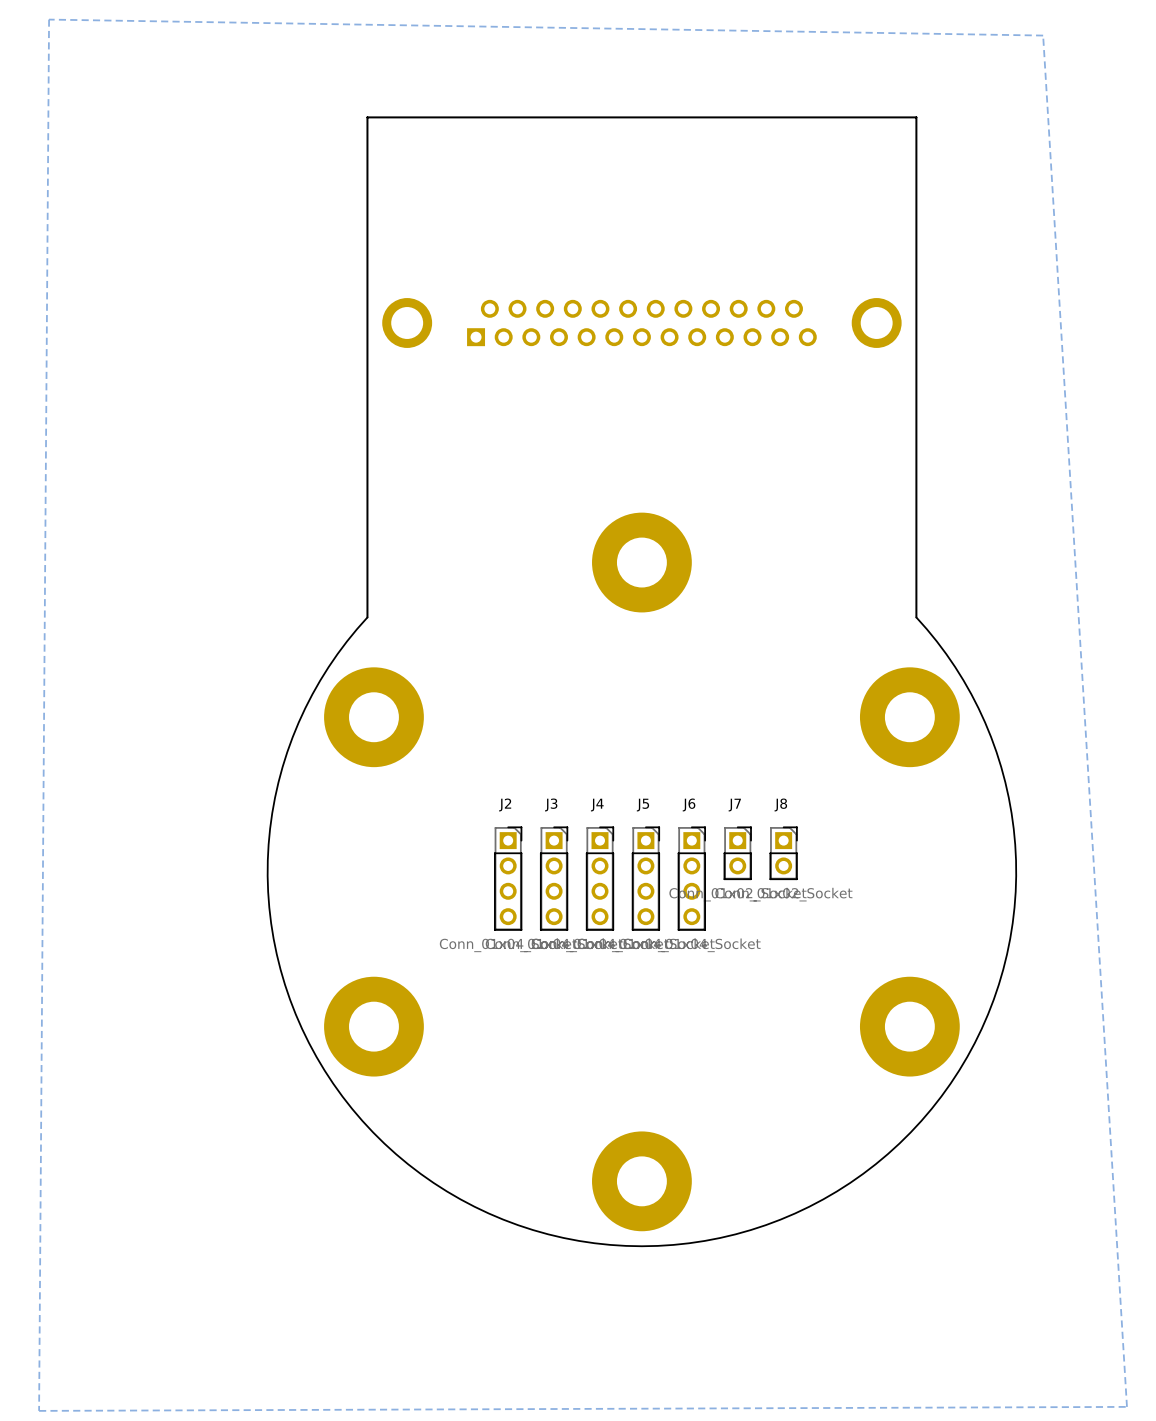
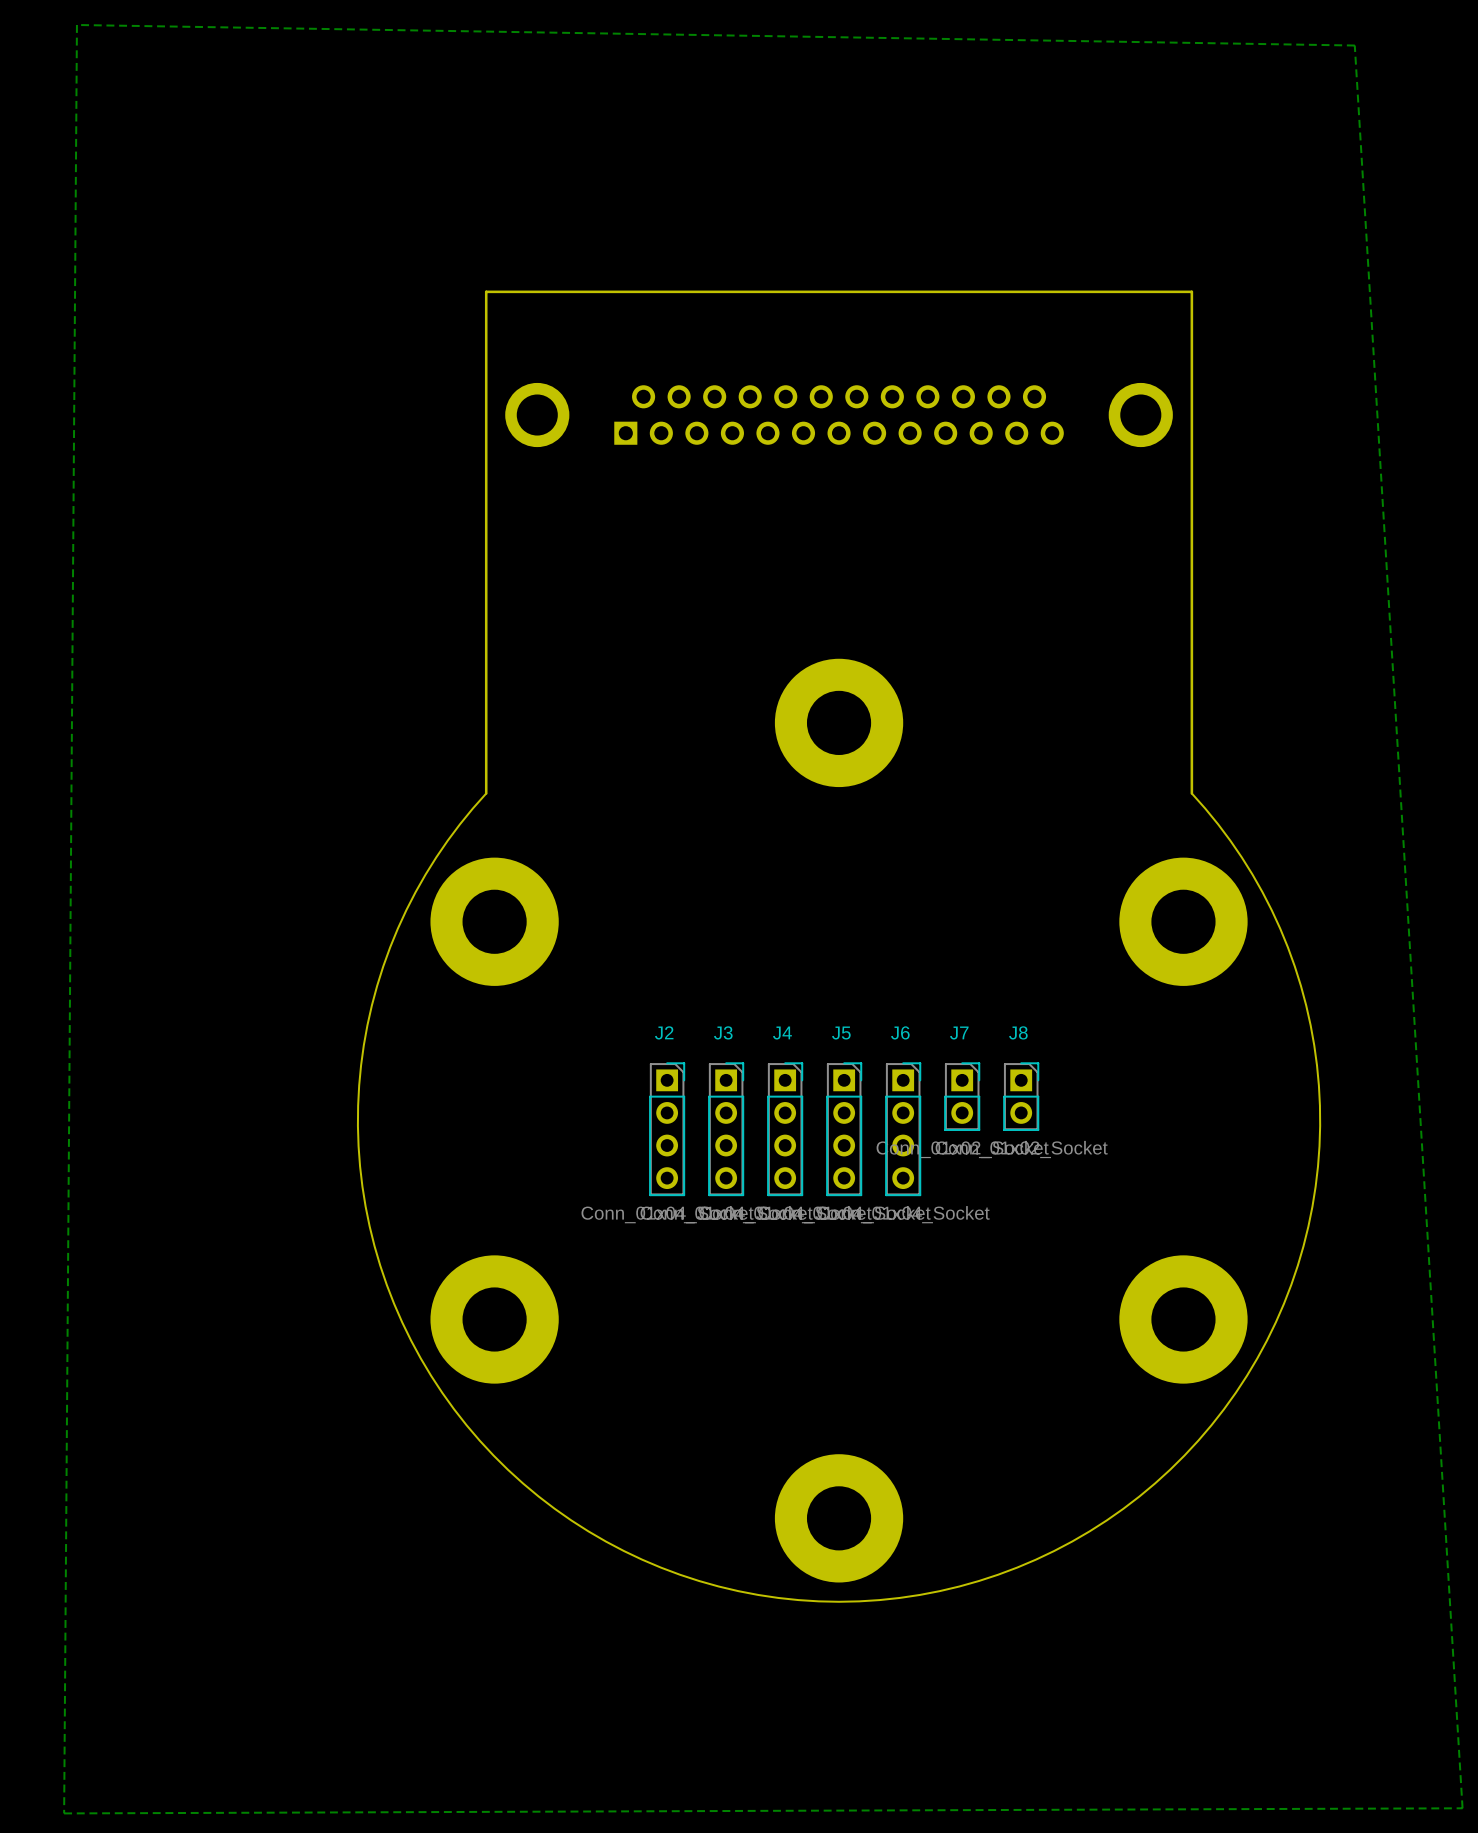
board edge: (916, 227) (916, 117) (367, 117) (367, 227) -> (1191, 291) (486, 291)

